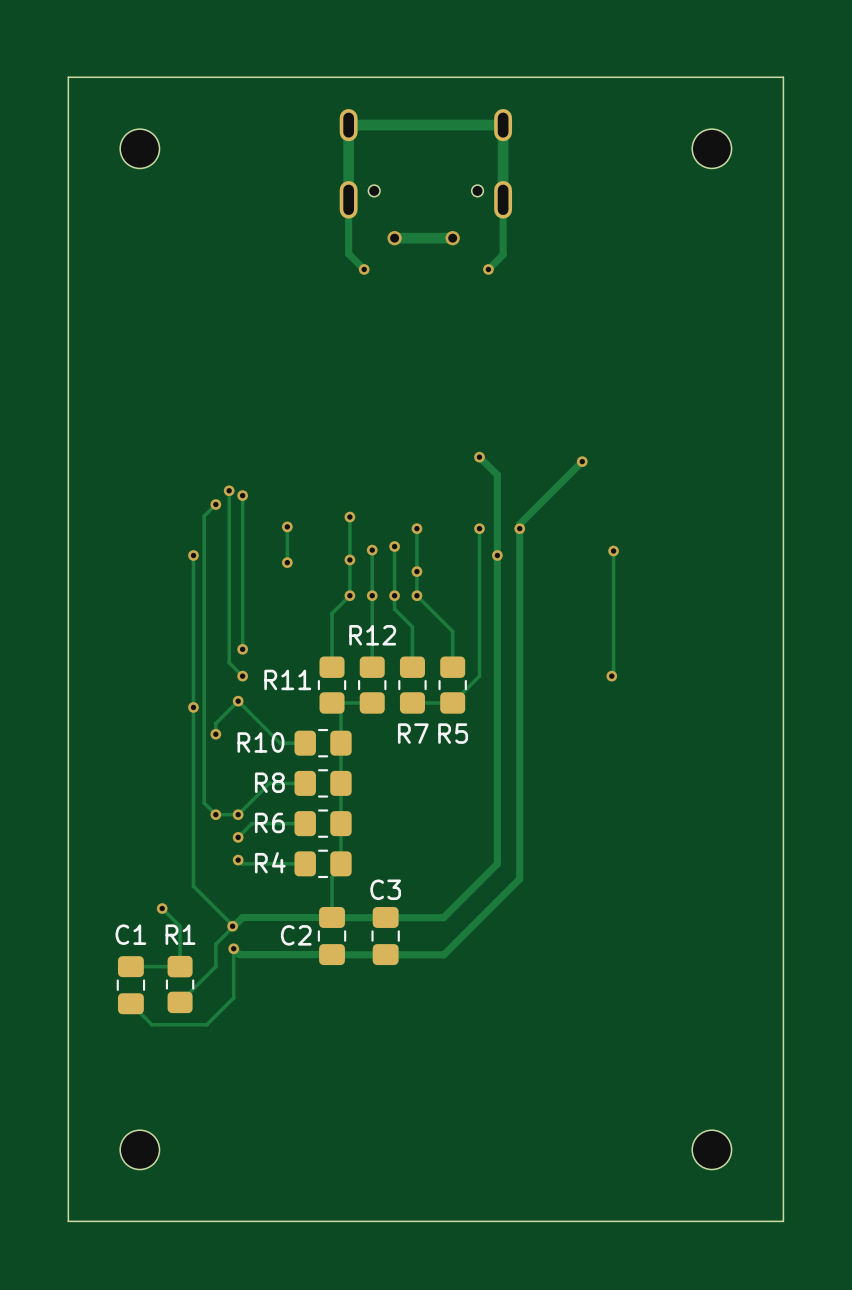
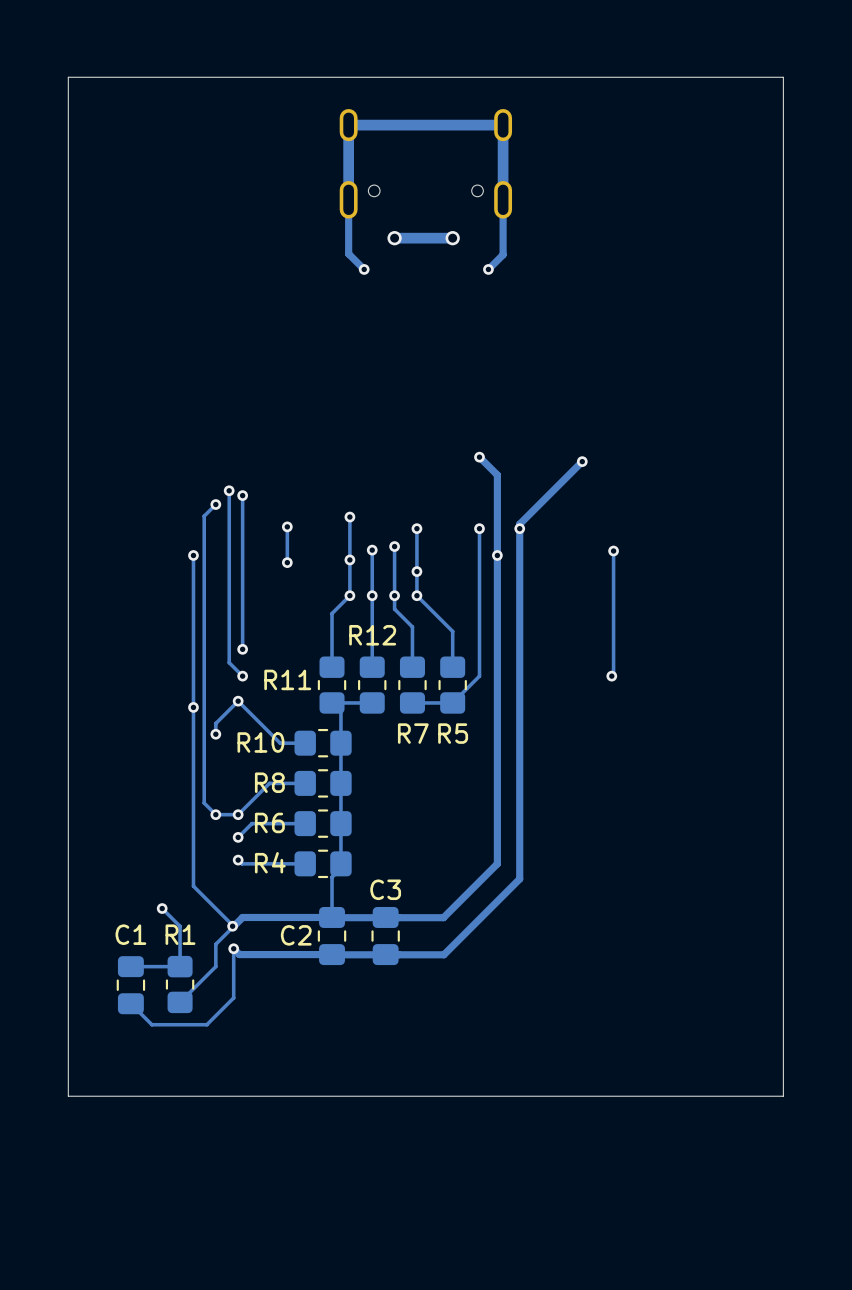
part: (139, 148) -> none
part: (711, 148) -> none
board edge: (783, 1096) (783, 1221) (68, 1221) (68, 1096) -> (783, 1096) (68, 1096)
part: (139, 1149) -> none
part: (711, 1149) -> none

